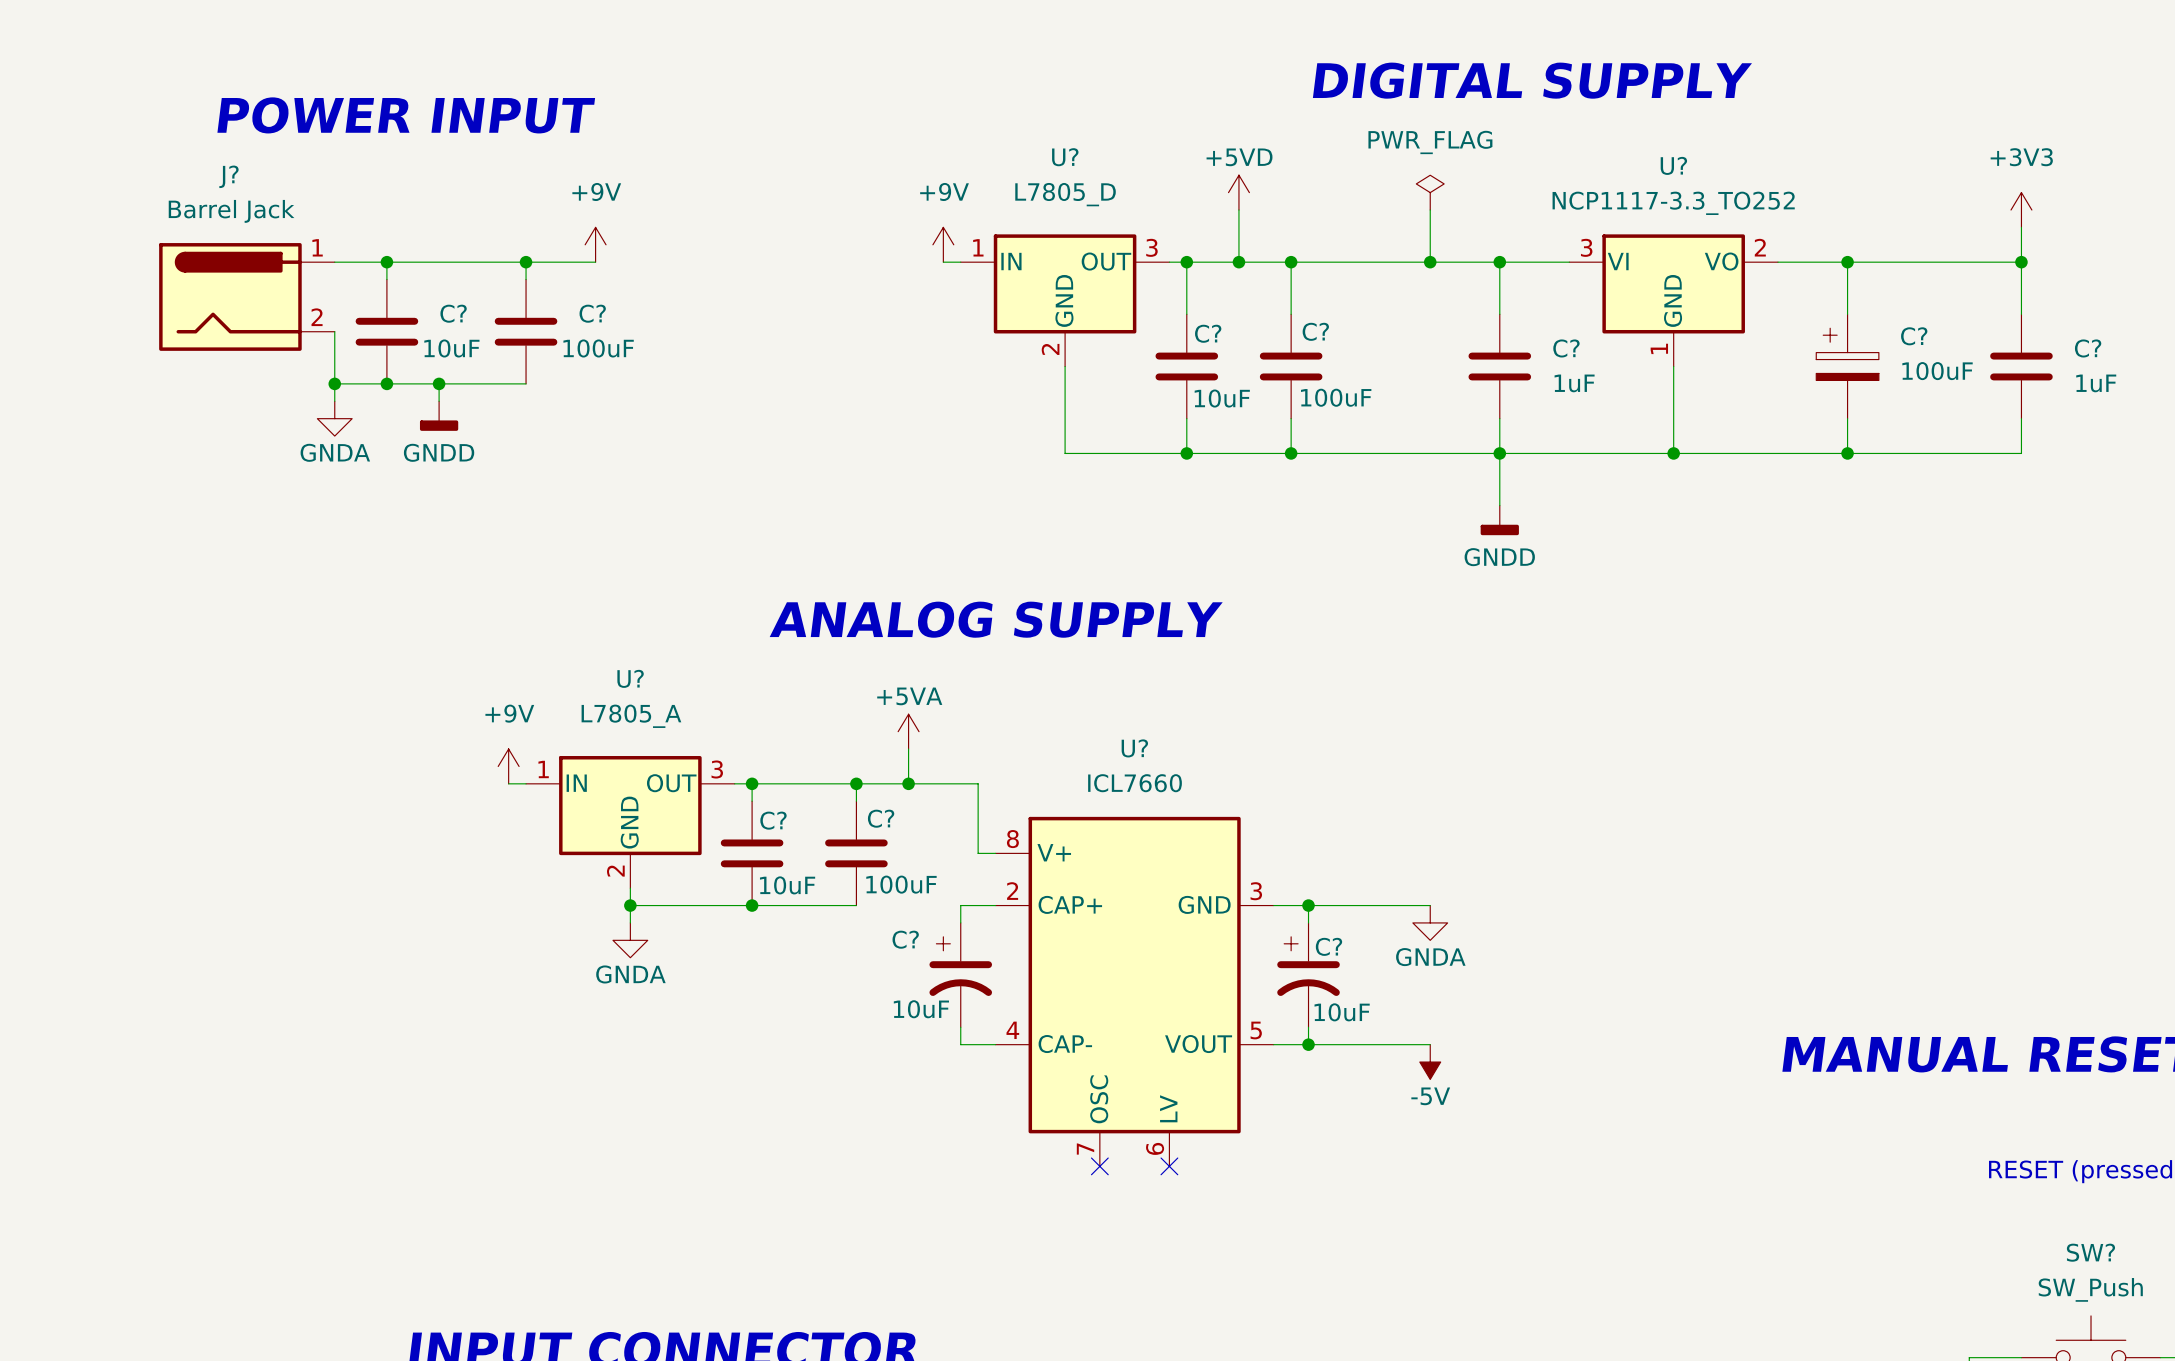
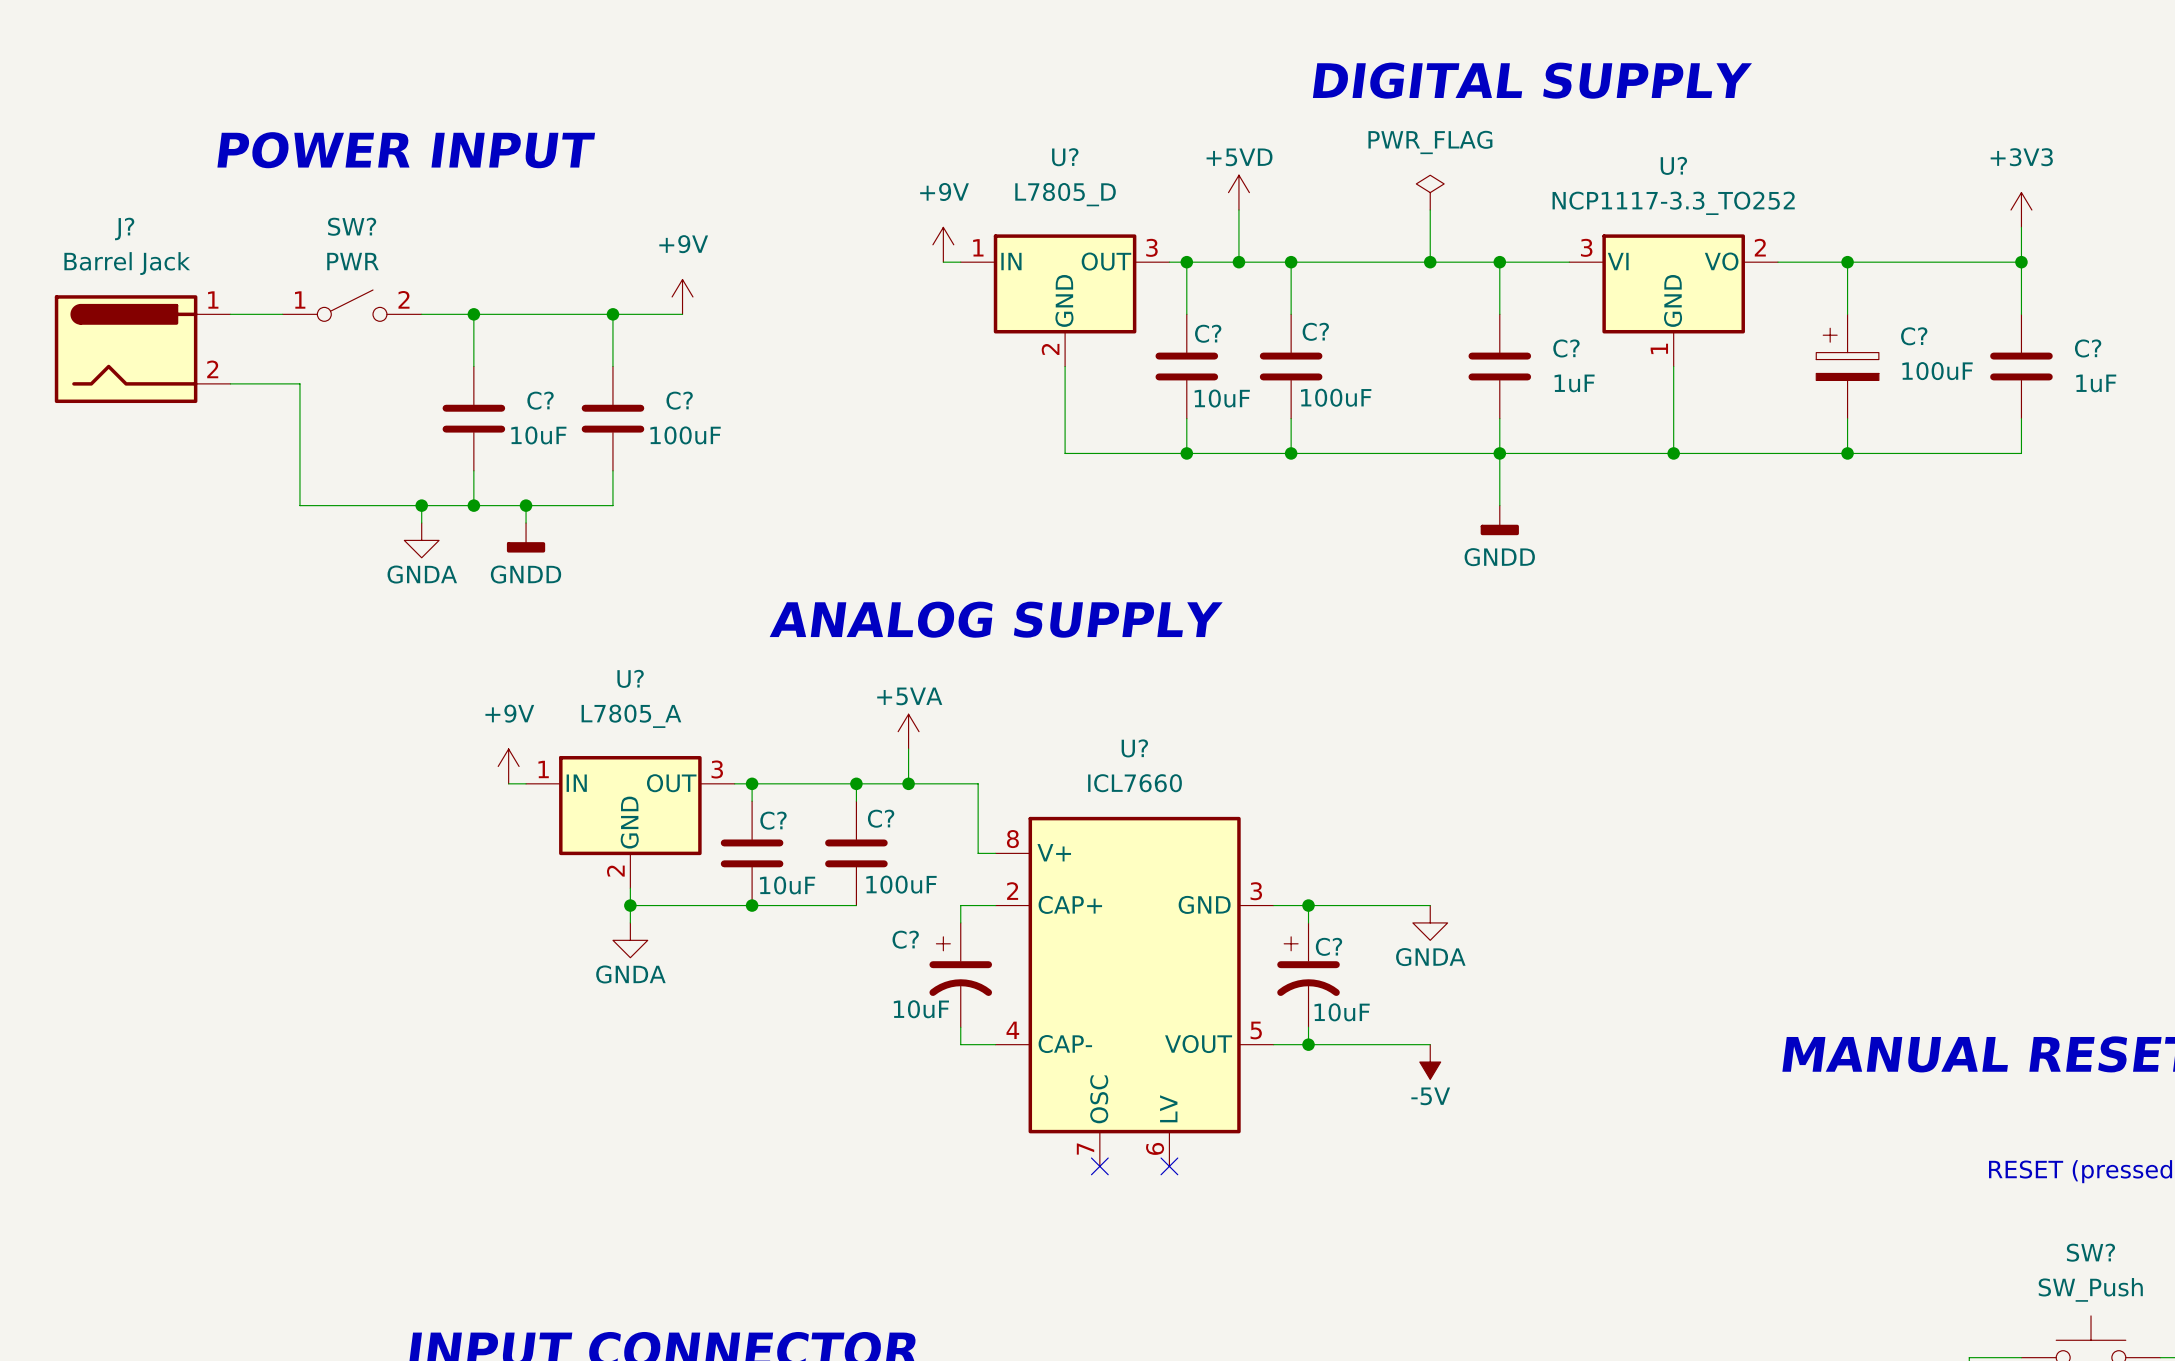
text position: POWER INPUT (406, 115) -> POWER INPUT (406, 150)
power symbol position: +9V (595, 244) -> +9V (682, 296)
wire: (334, 262) (595, 262) -> (421, 314) (682, 314)
wire: (386, 262) (386, 279) -> none
junction: (386, 262) -> none
wire: (526, 262) (526, 279) -> (526, 505) (526, 523)
junction: (526, 262) -> none
J? position: (246, 296) -> (142, 349)
SW?: none -> PWR (352, 305)
wire: none -> (473, 314) (473, 366)
junction: none -> (473, 314)
wire: none -> (612, 314) (612, 366)
junction: none -> (612, 314)
wire: (334, 331) (334, 401) -> none
C? position: (386, 331) -> (473, 418)
C? position: (526, 331) -> (612, 418)
wire: none -> (230, 383) (299, 383) (299, 505) (612, 505) (612, 470)
wire: (334, 383) (526, 383) -> none
junction: (334, 383) -> none
junction: (386, 383) -> none
wire: (439, 383) (439, 401) -> (421, 505) (421, 523)
junction: (439, 383) -> none
power symbol position: GNDD (439, 416) -> GNDD (526, 537)
power symbol position: GNDA (334, 418) -> GNDA (421, 540)
wire: none -> (473, 470) (473, 505)
junction: none -> (421, 505)
junction: none -> (473, 505)
junction: none -> (526, 505)

